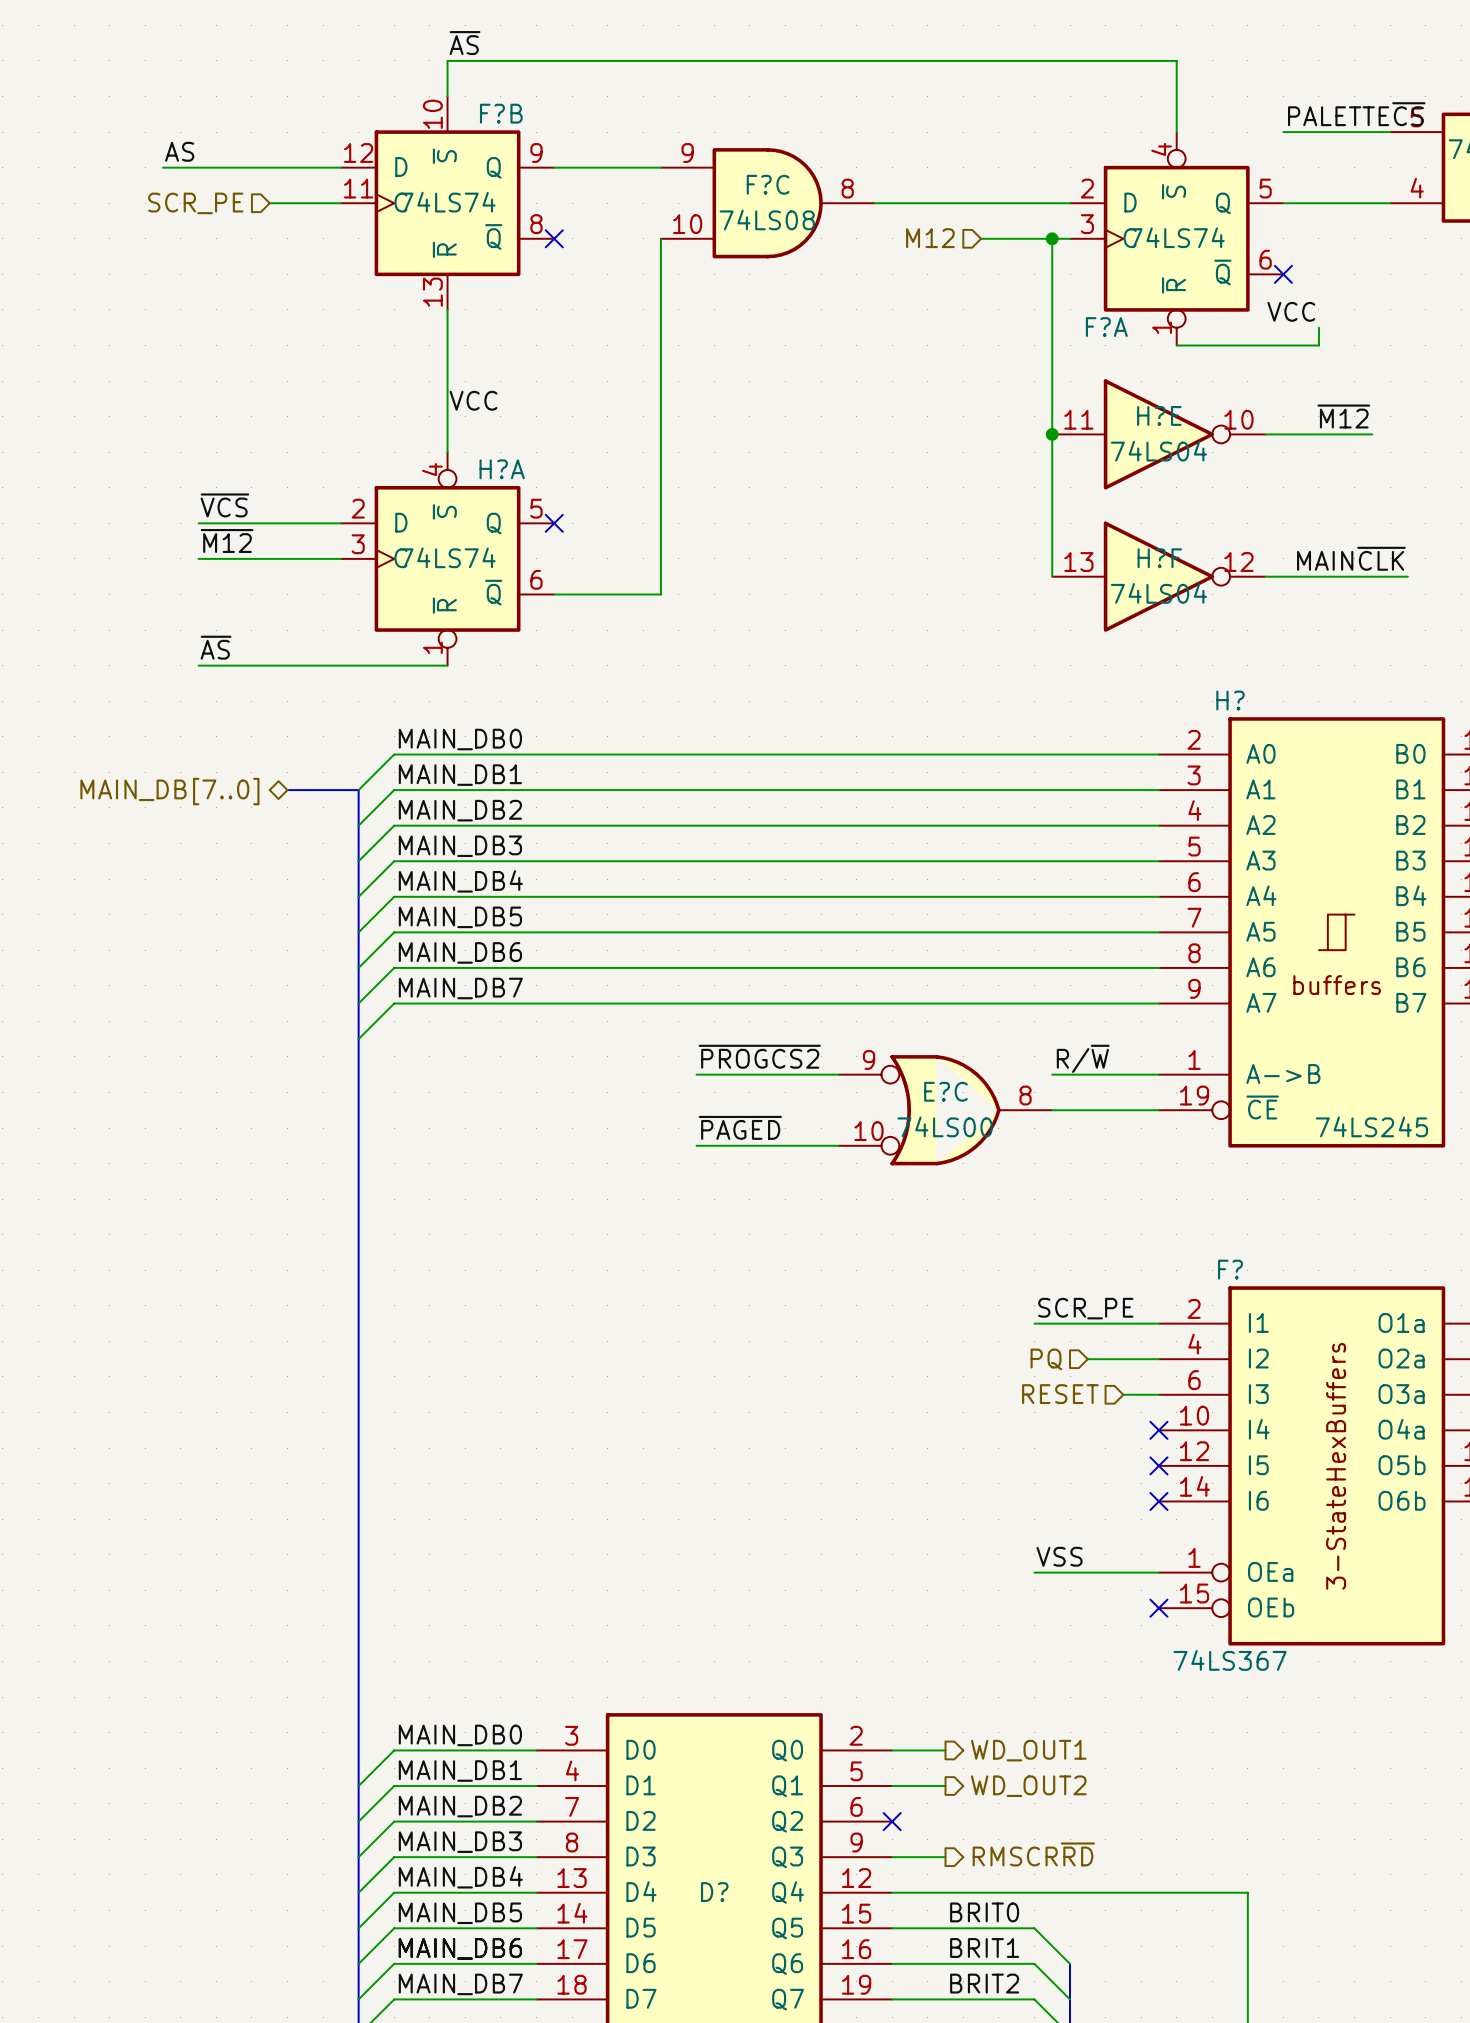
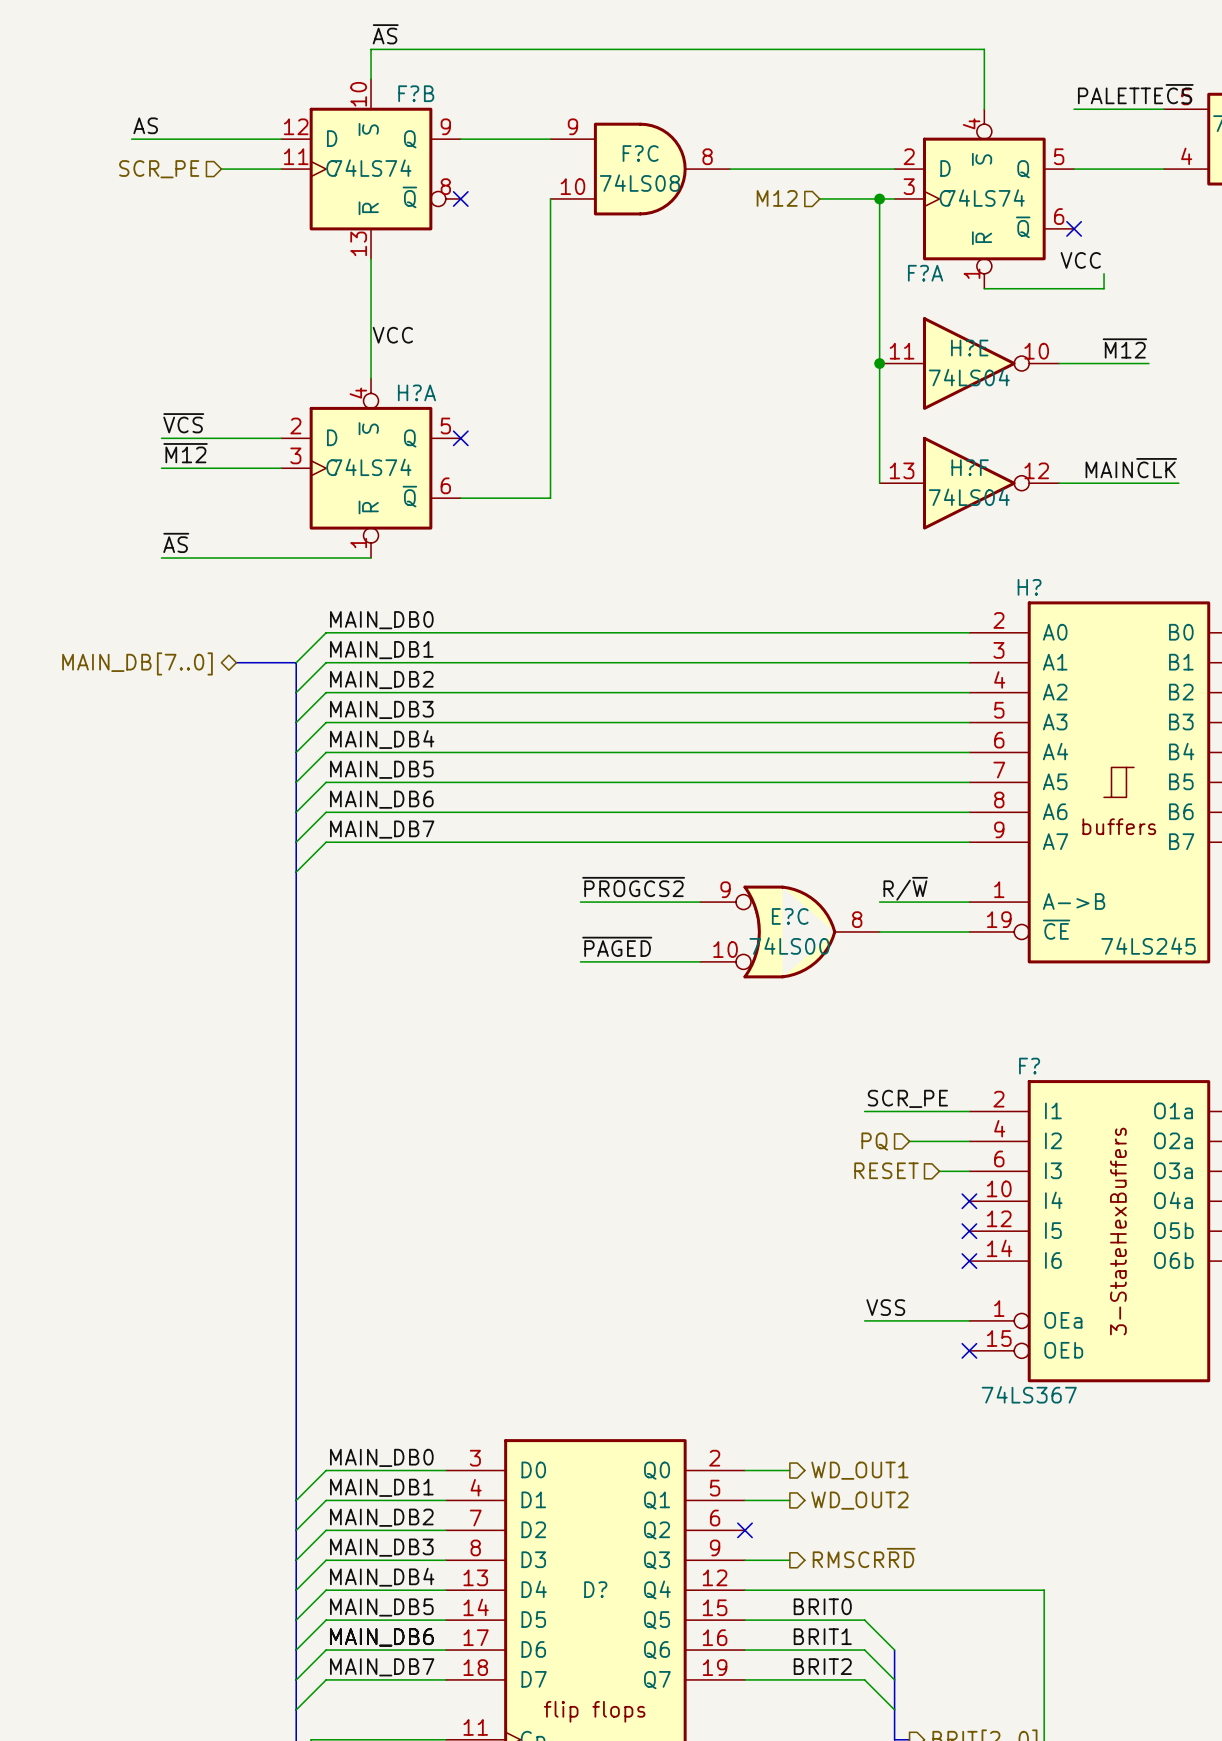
F?B symbol: [340, 96, 555, 310] -> [281, 79, 461, 259]

